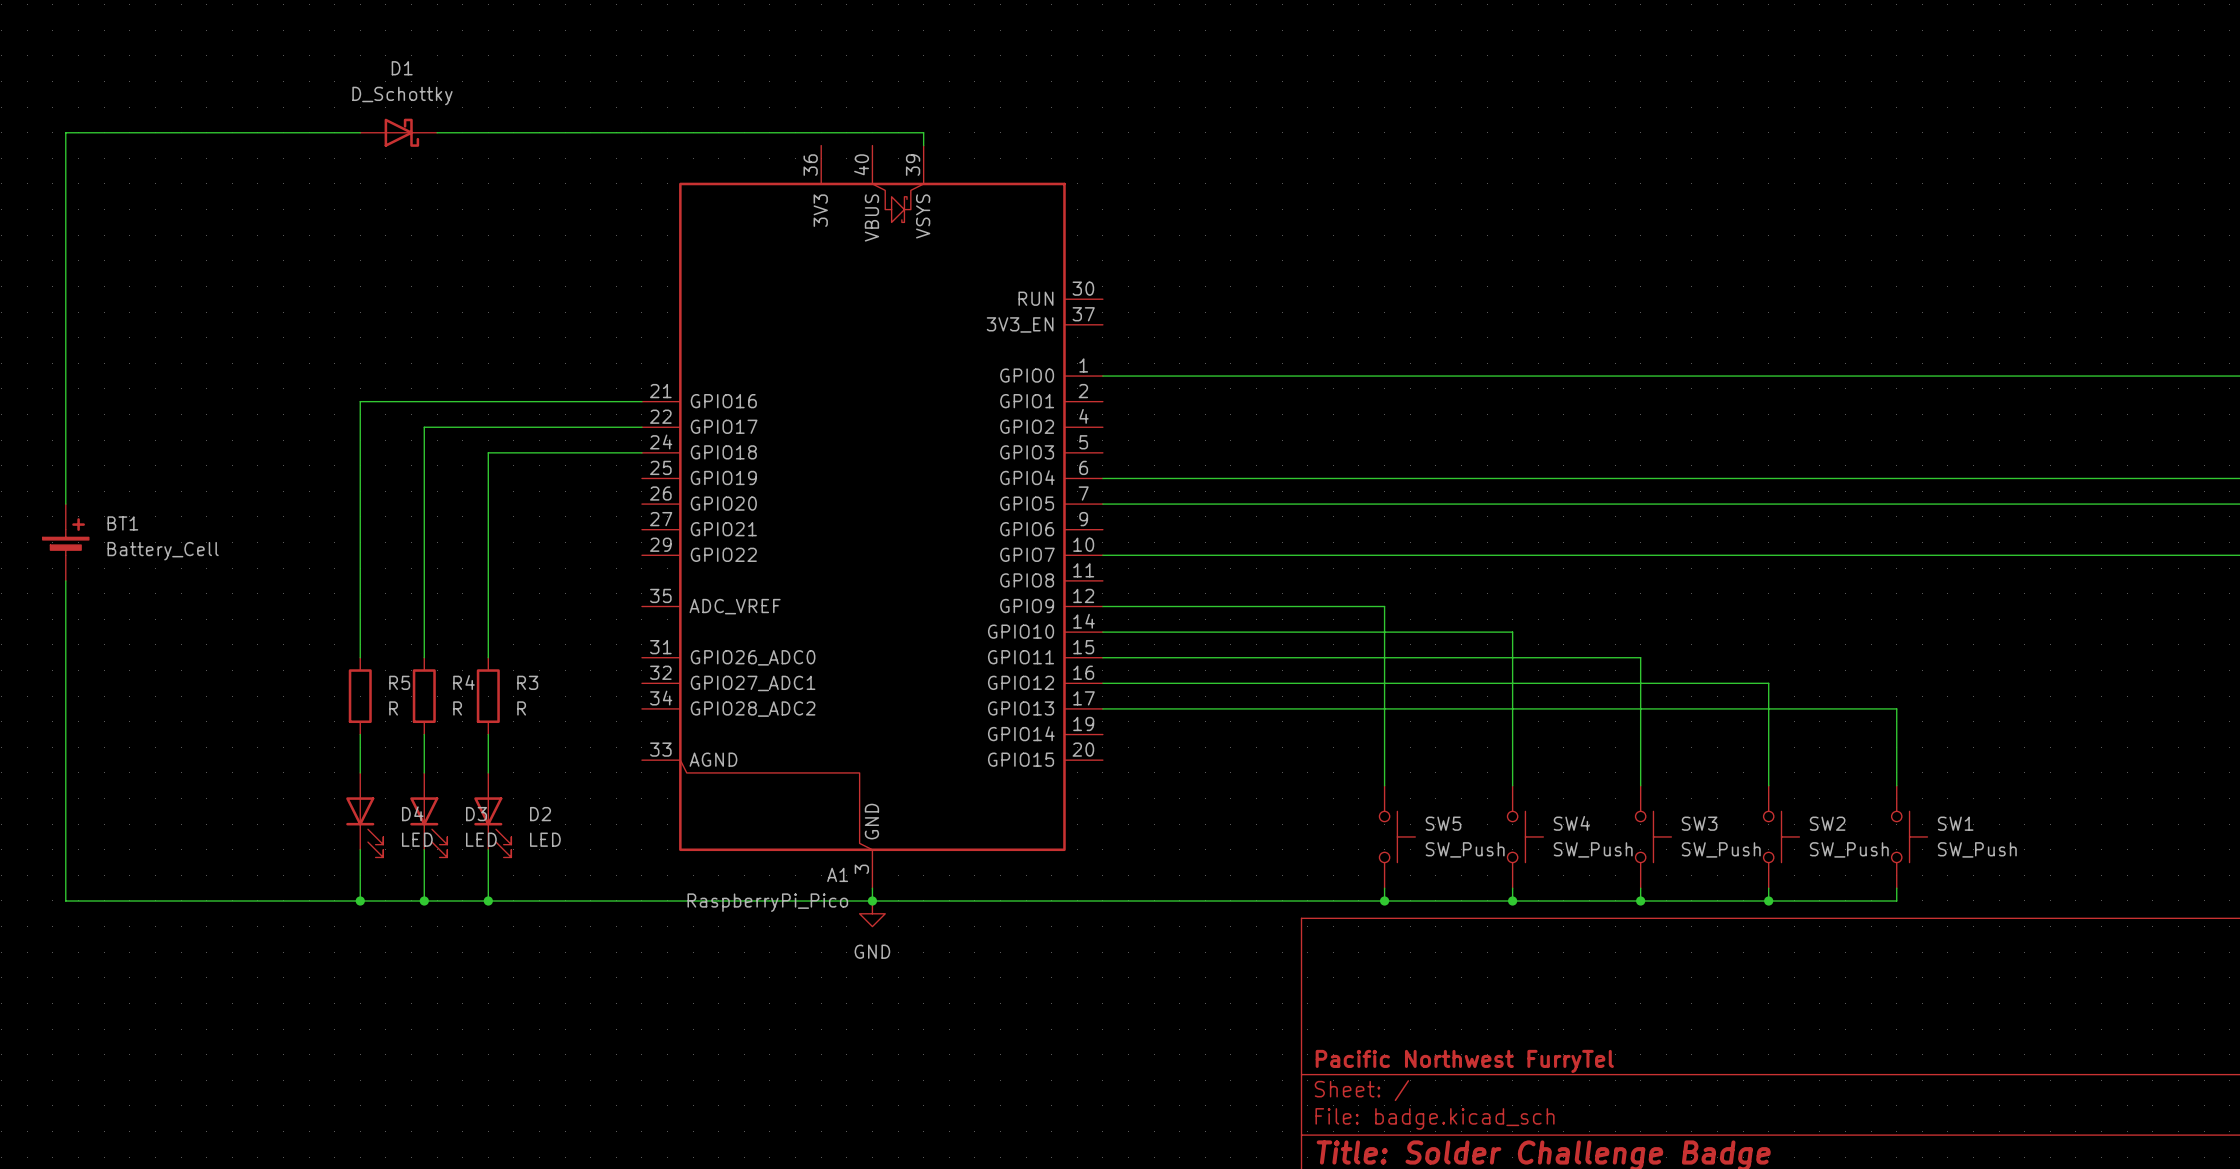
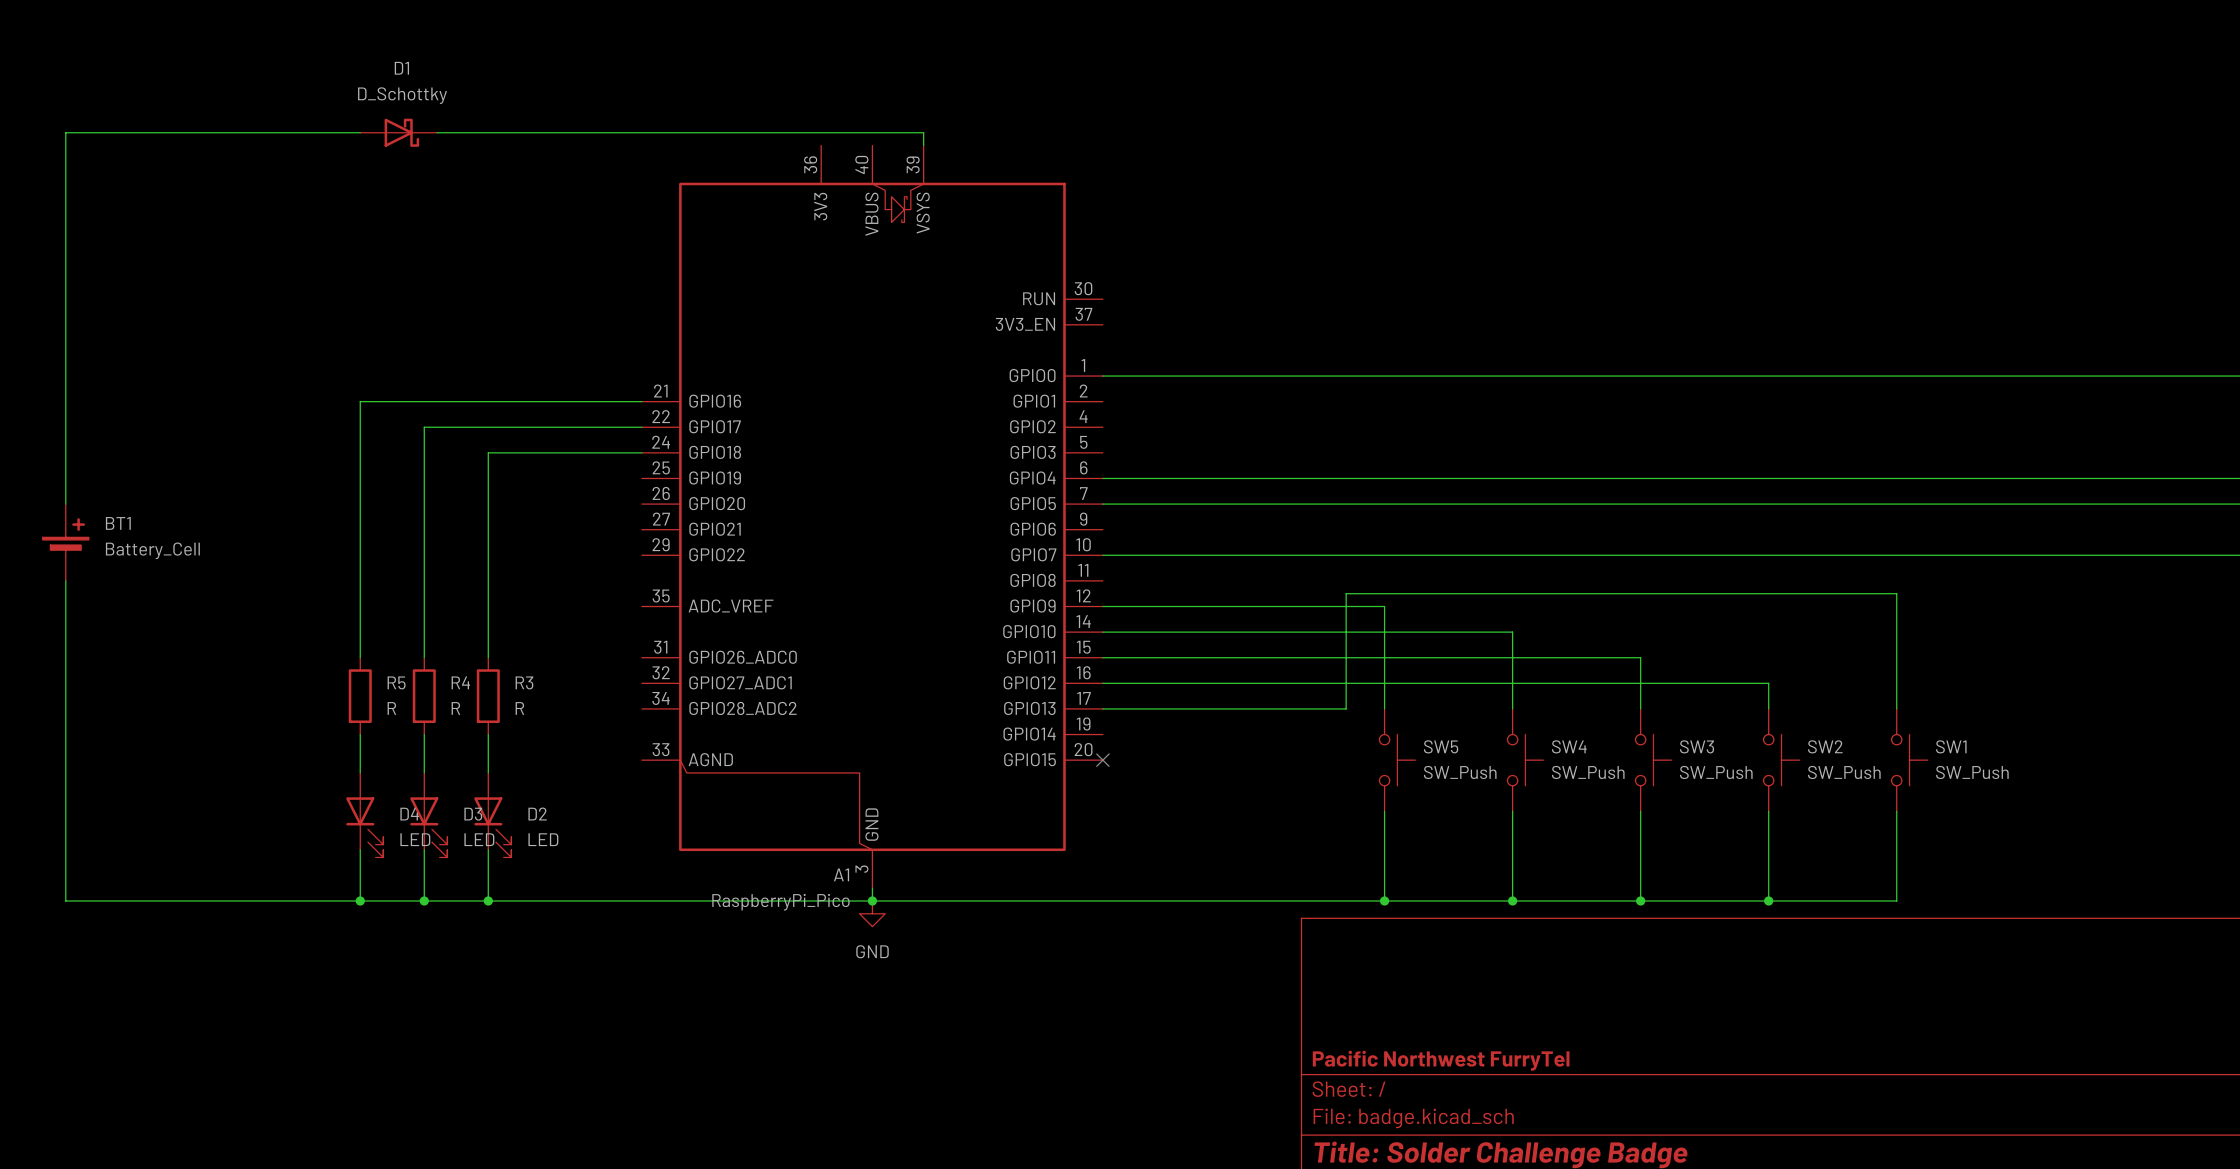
wire: (1346, 708) (1896, 708) (1896, 785) -> (1346, 708) (1346, 593) (1896, 593) (1896, 708)
wire: (1384, 708) (1384, 785) -> (1384, 811) (1384, 888)
wire: (1512, 708) (1512, 785) -> (1512, 811) (1512, 888)
wire: (1640, 708) (1640, 785) -> (1640, 811) (1640, 888)
wire: (1768, 708) (1768, 785) -> (1768, 811) (1768, 888)
no-connect mark: none -> (1102, 760)
wire: none -> (1896, 811) (1896, 888)
SW5 position: (1397, 836) -> (1397, 760)
SW4 position: (1525, 836) -> (1525, 760)
SW3 position: (1653, 836) -> (1653, 760)
SW2 position: (1781, 836) -> (1781, 760)
SW1 position: (1909, 836) -> (1909, 760)

